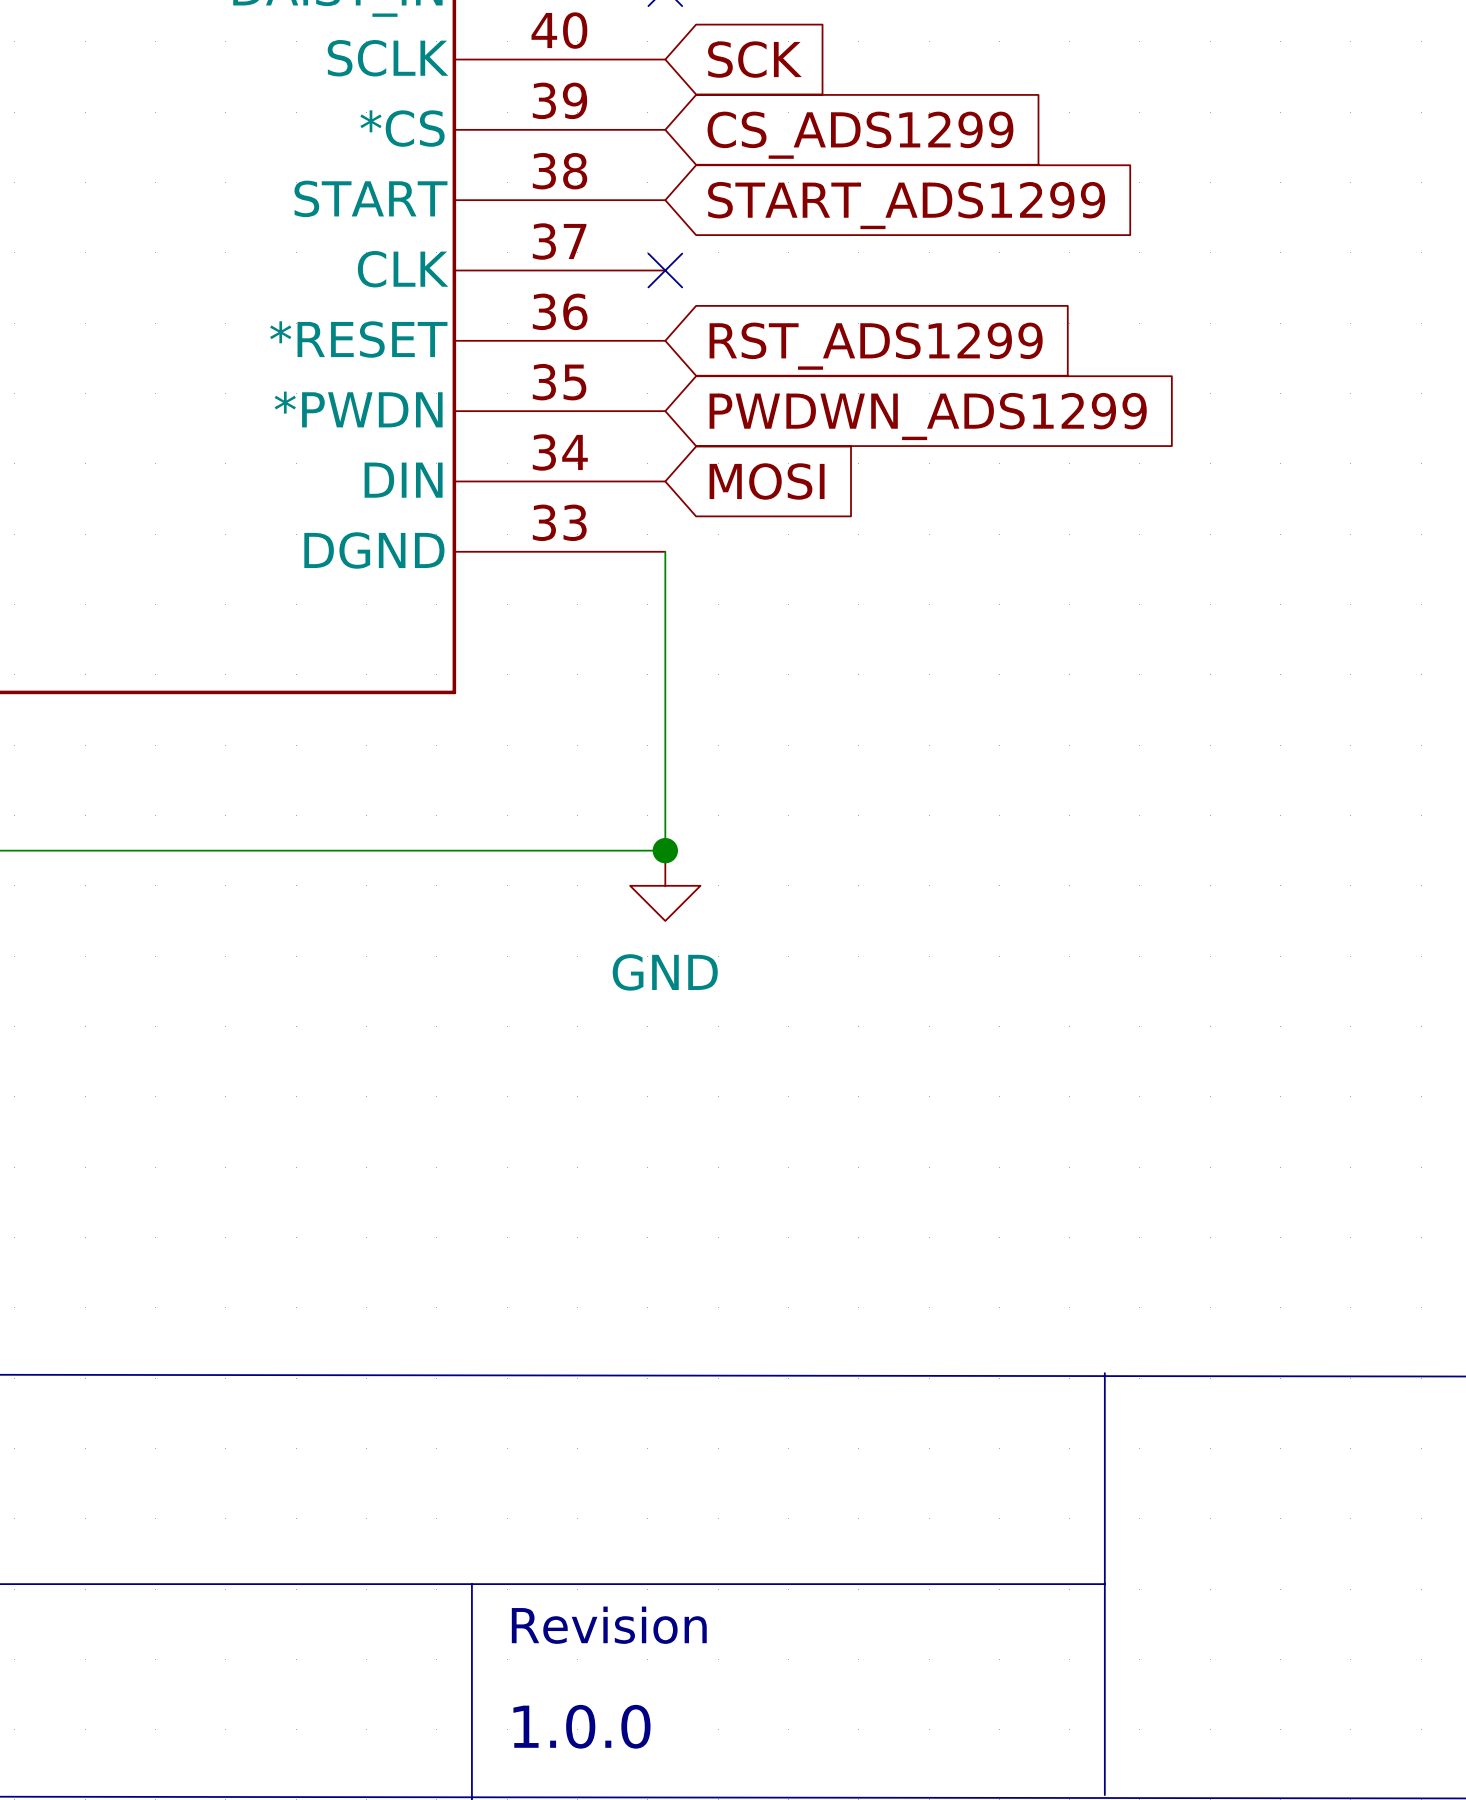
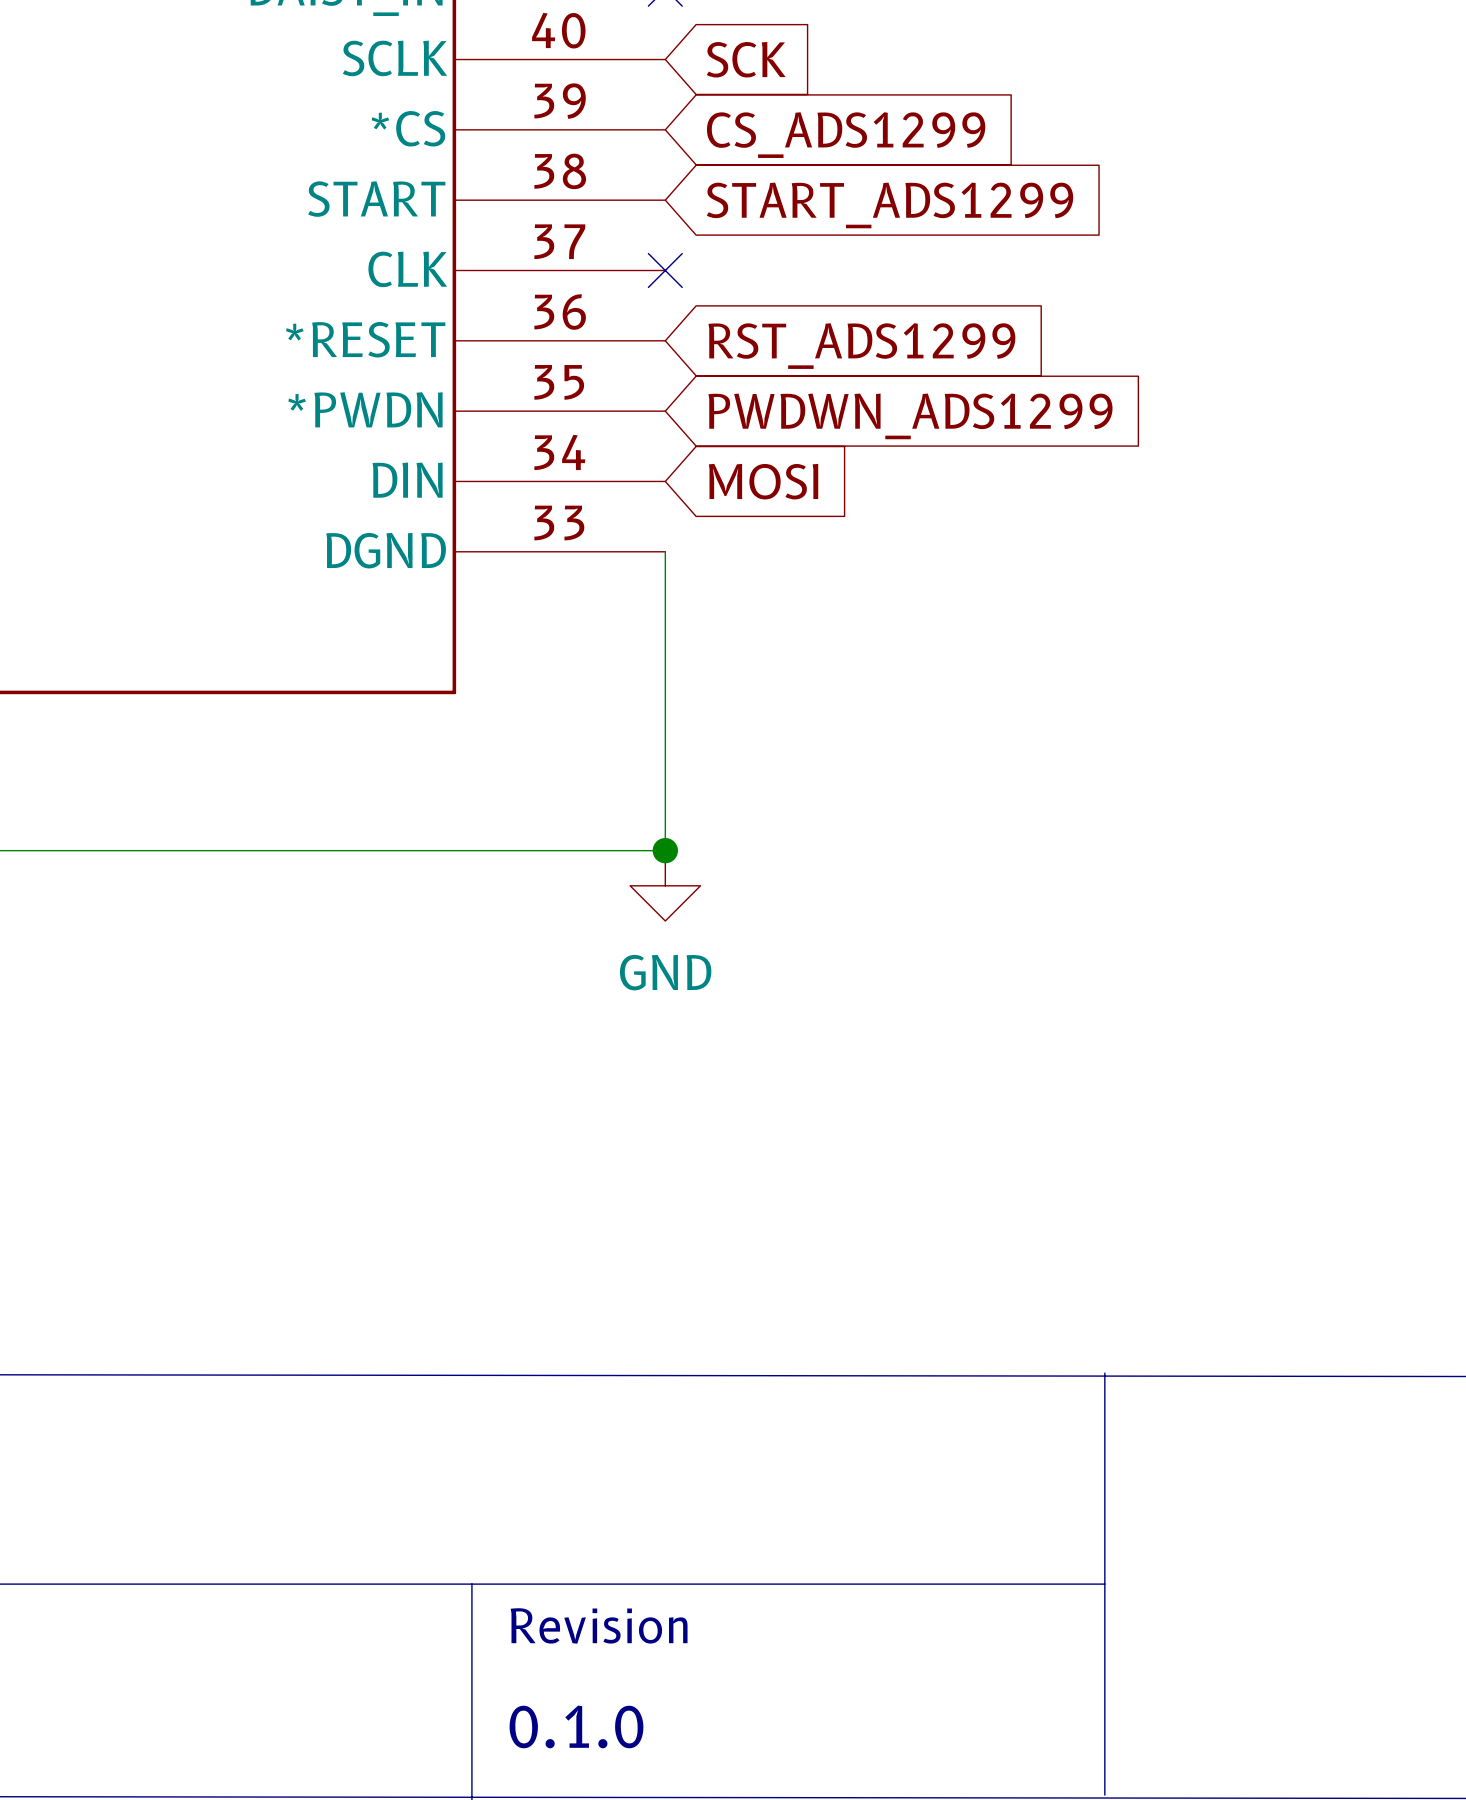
text: 1.0.0 (581, 1726) -> 0.1.0 (576, 1726)

